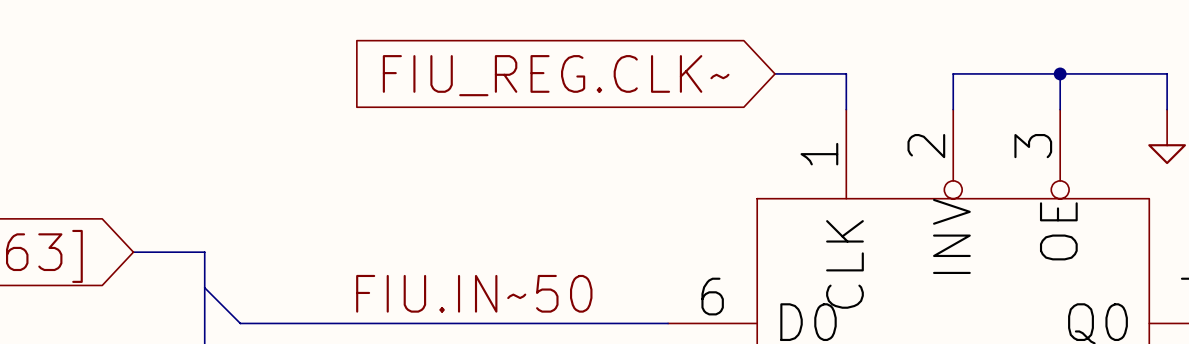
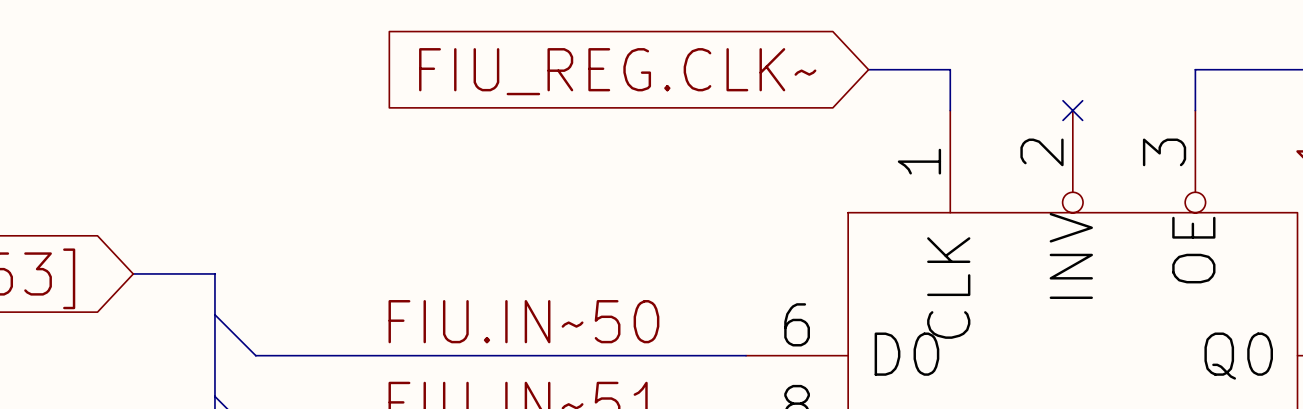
wire: (1060, 73) (953, 73) (953, 109) -> none
junction: (1060, 73) -> none
no-connect mark: none -> (1072, 110)

